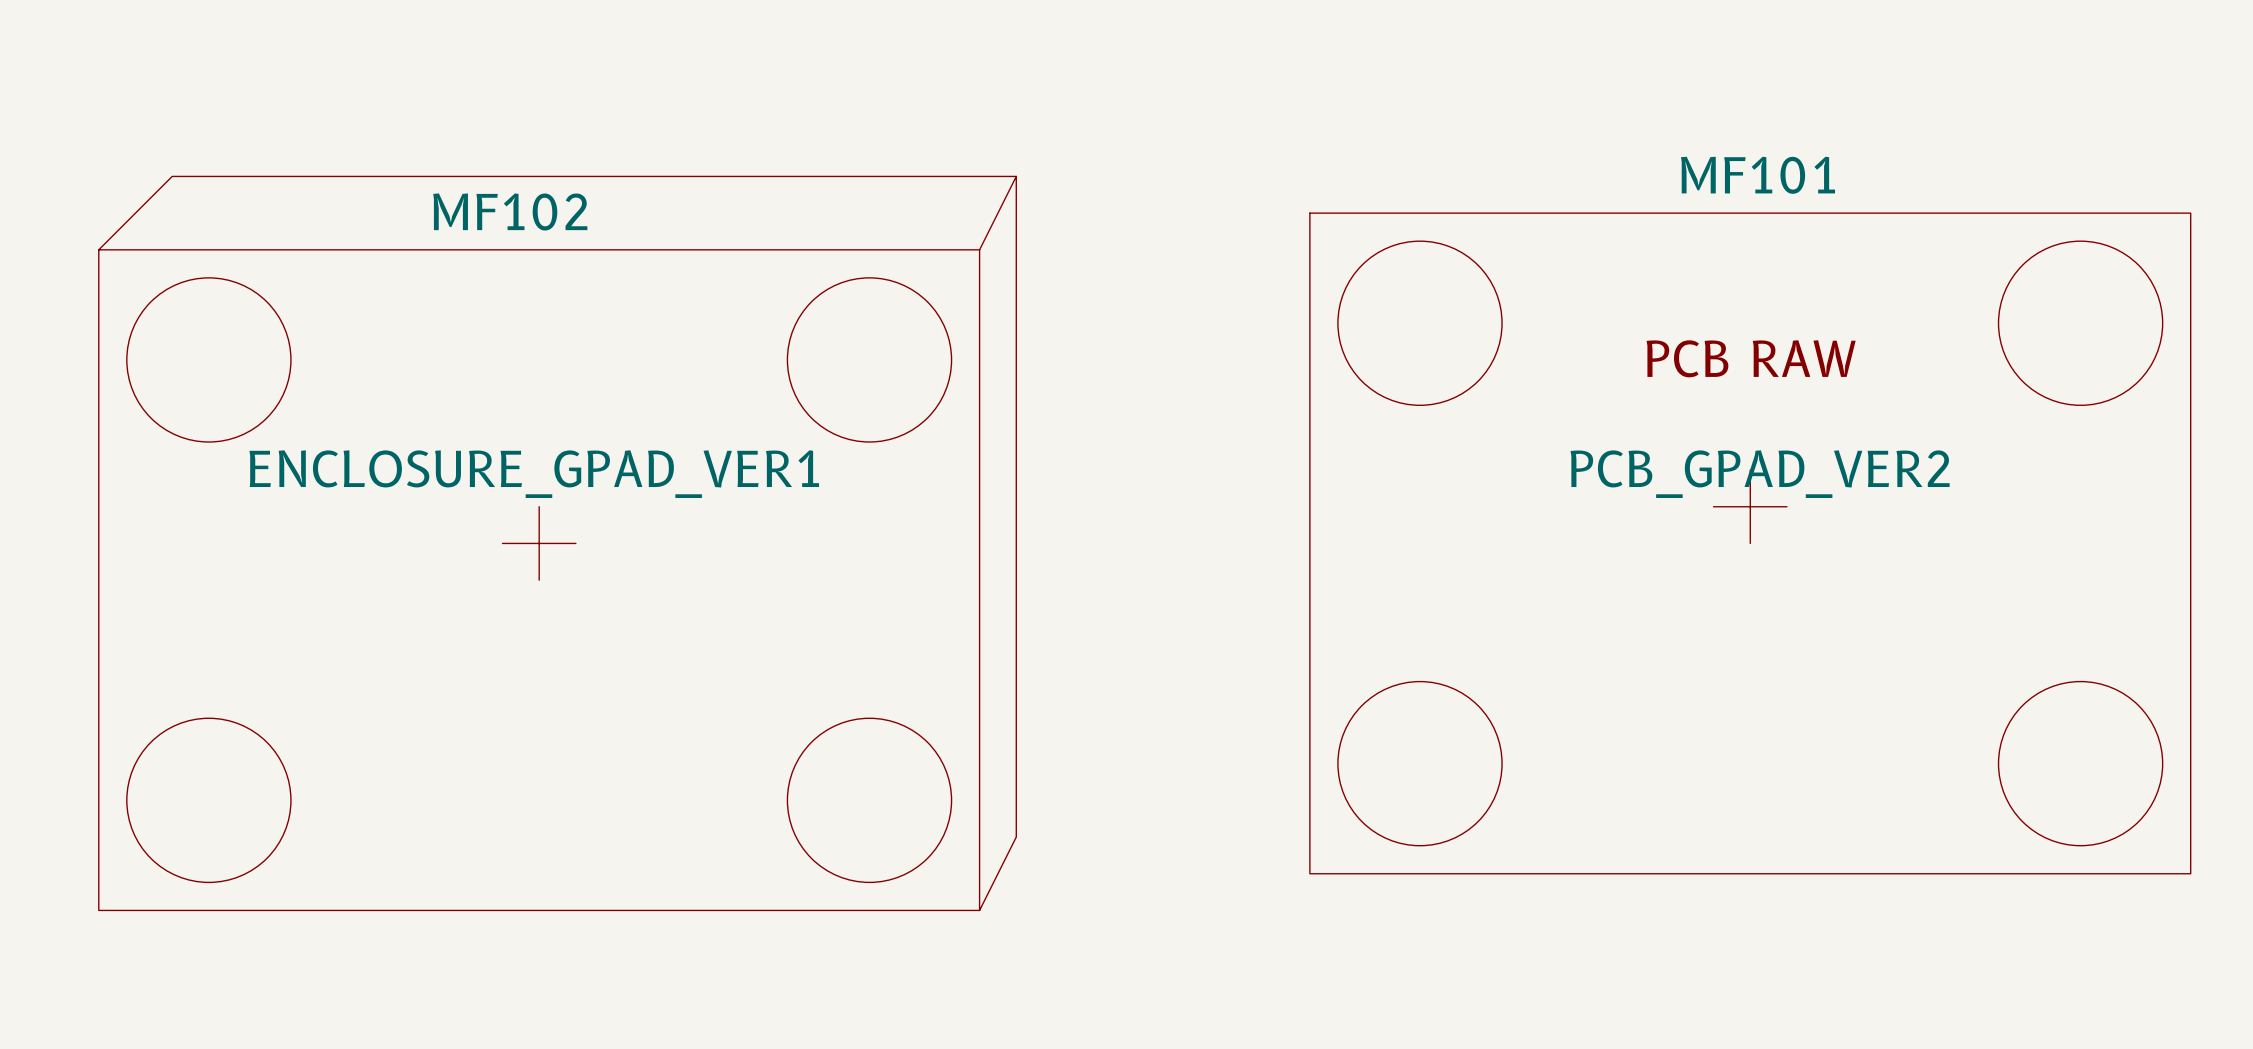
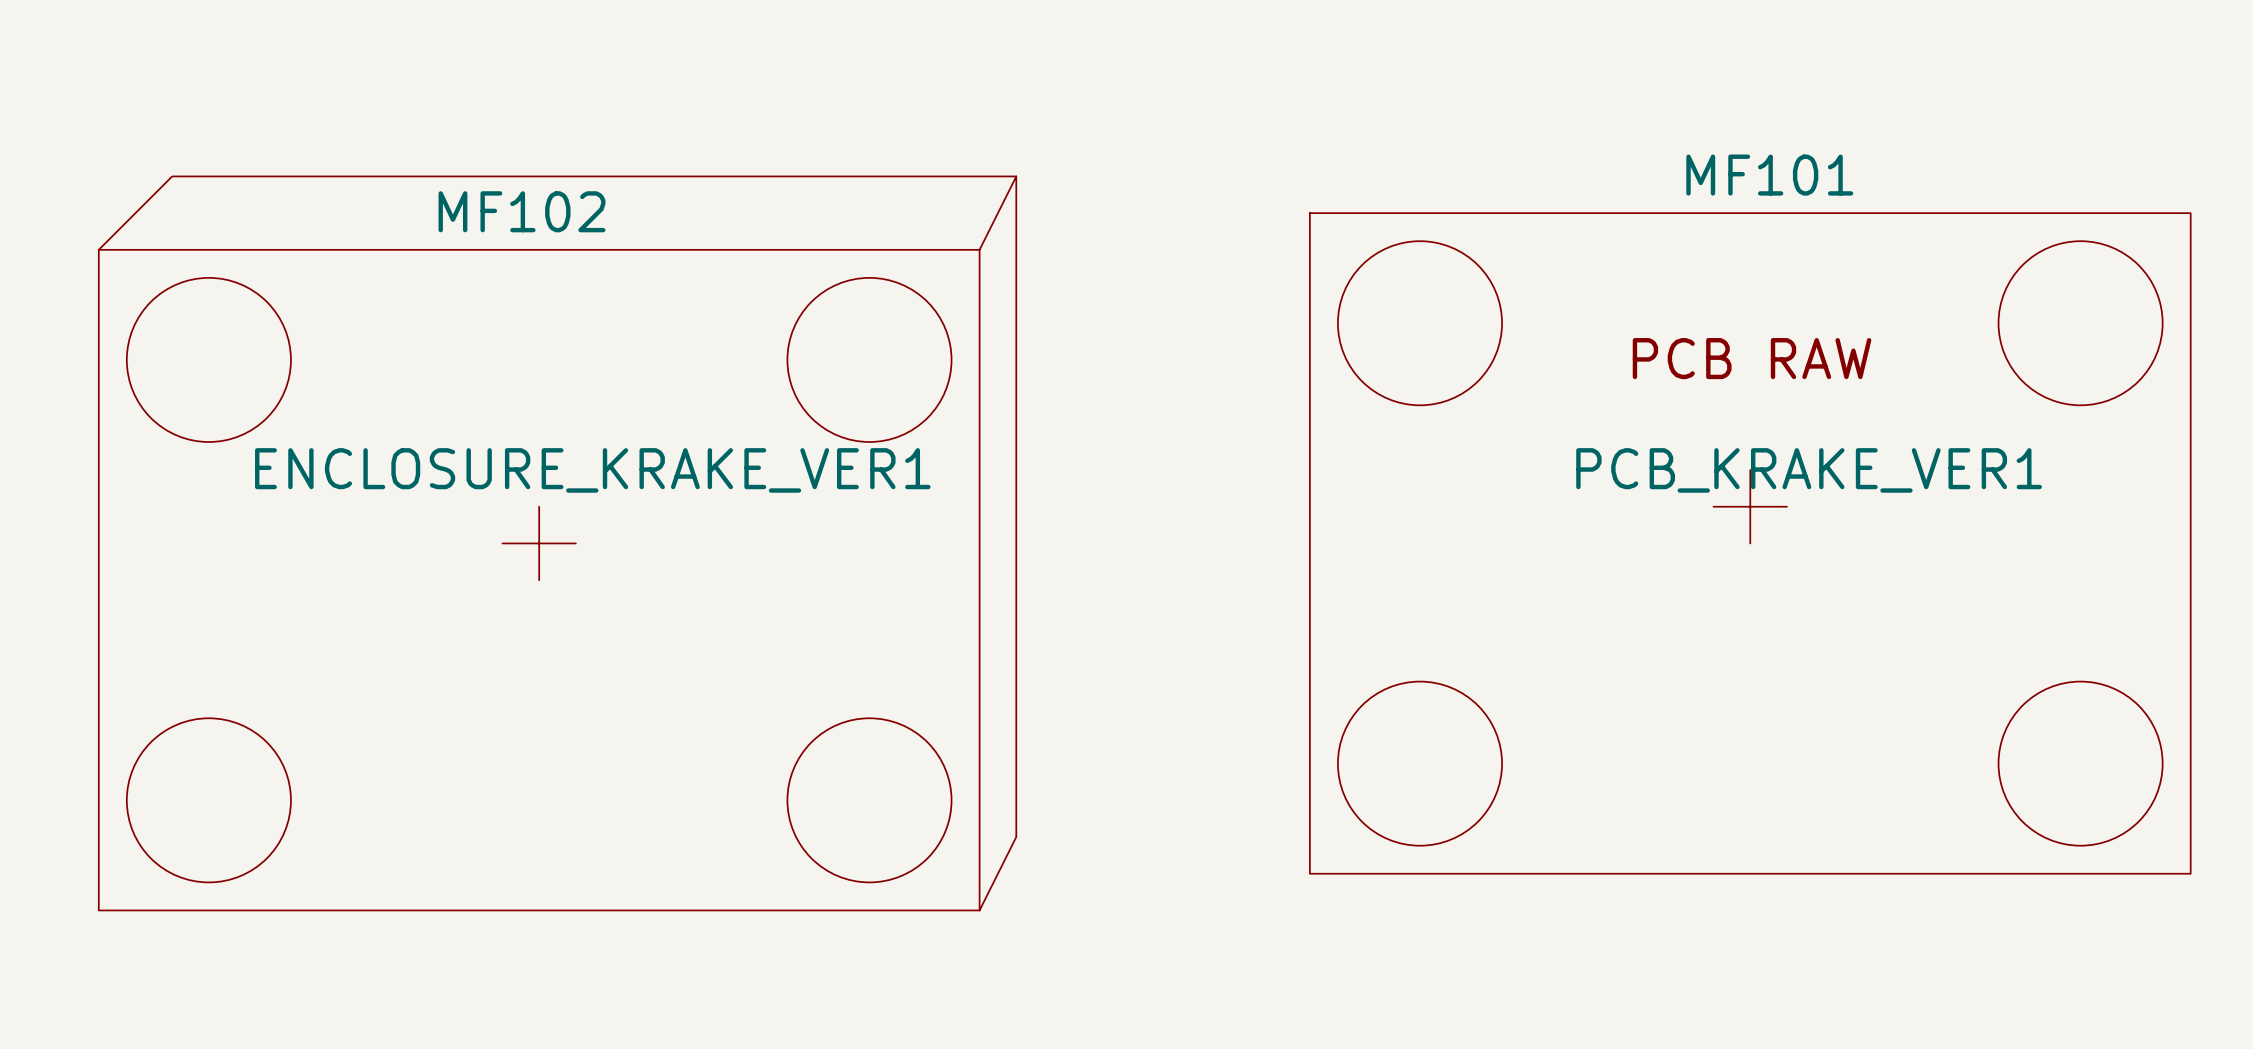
MF102 value: ENCLOSURE_GPAD_VER1 (534, 474) -> ENCLOSURE_KRAKE_VER1 (592, 470)
MF101 value: PCB_GPAD_VER2 (1760, 474) -> PCB_KRAKE_VER1 (1809, 470)

